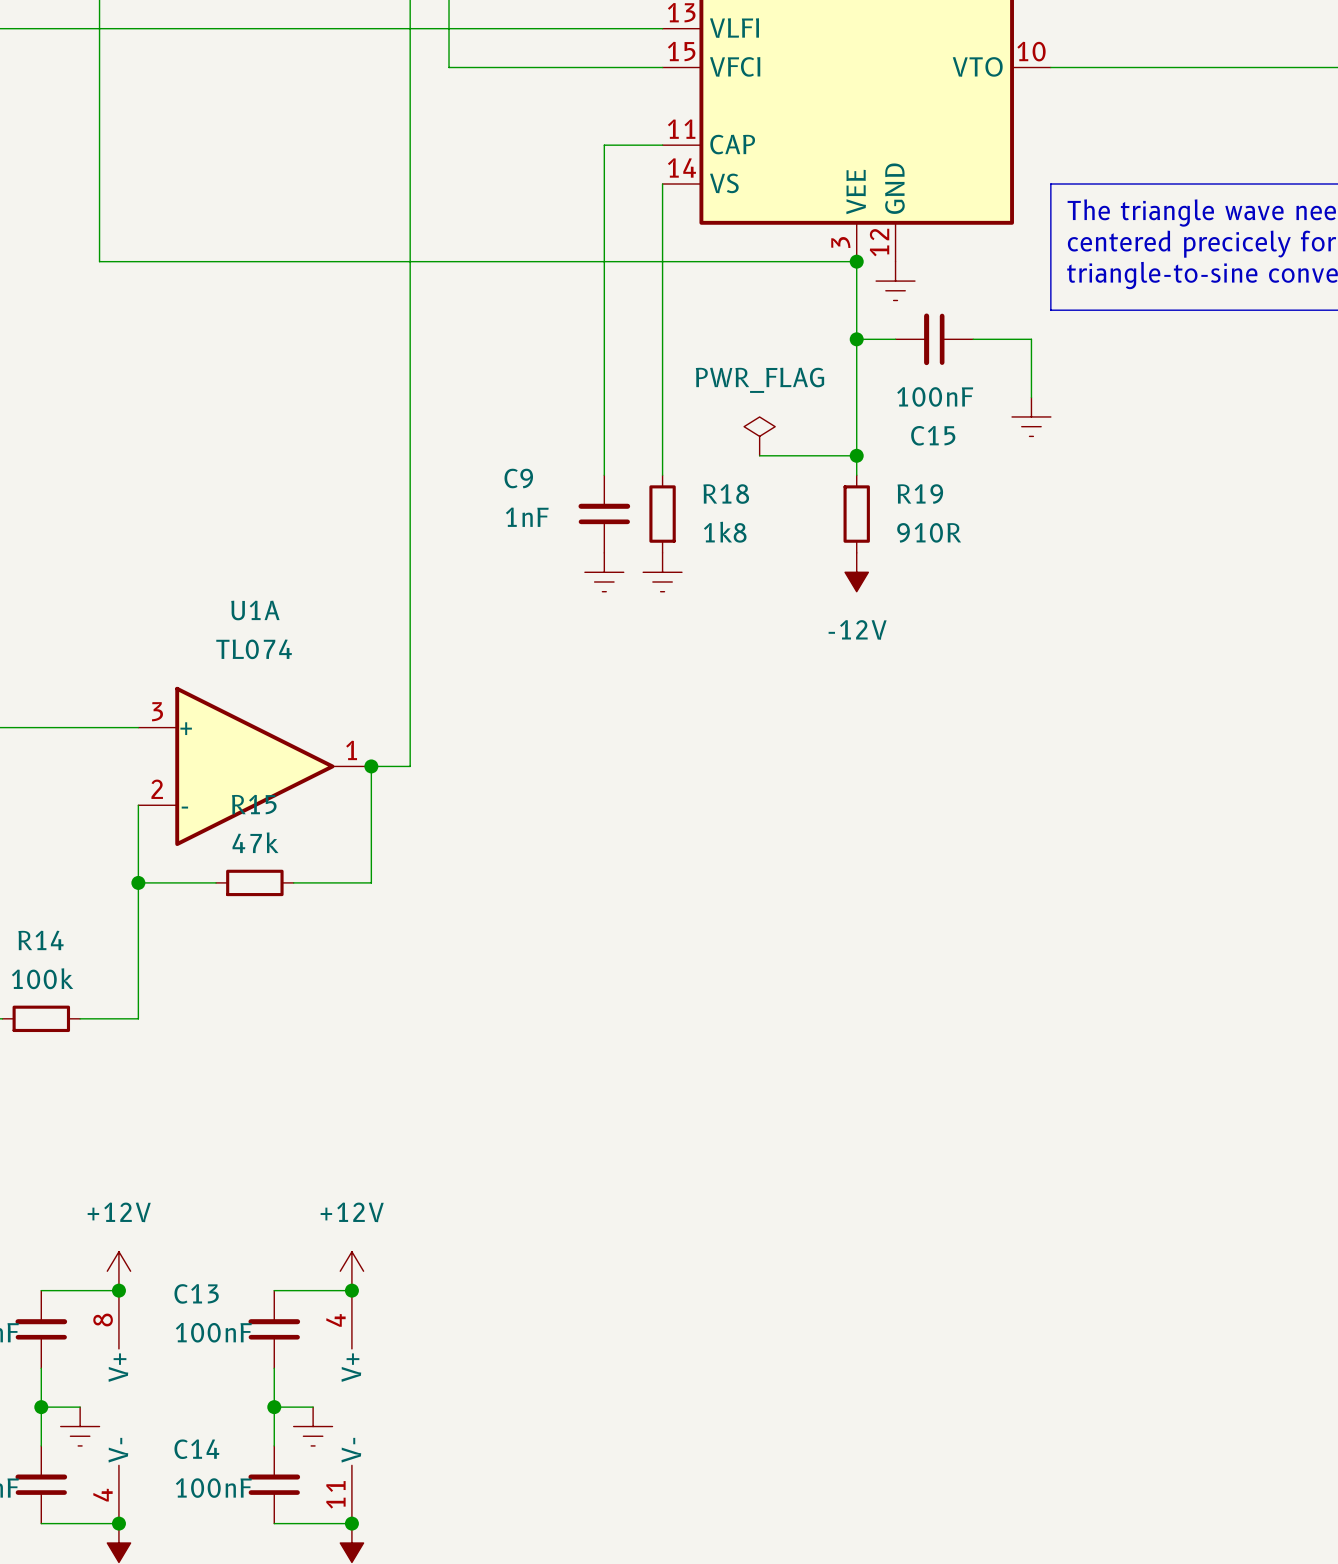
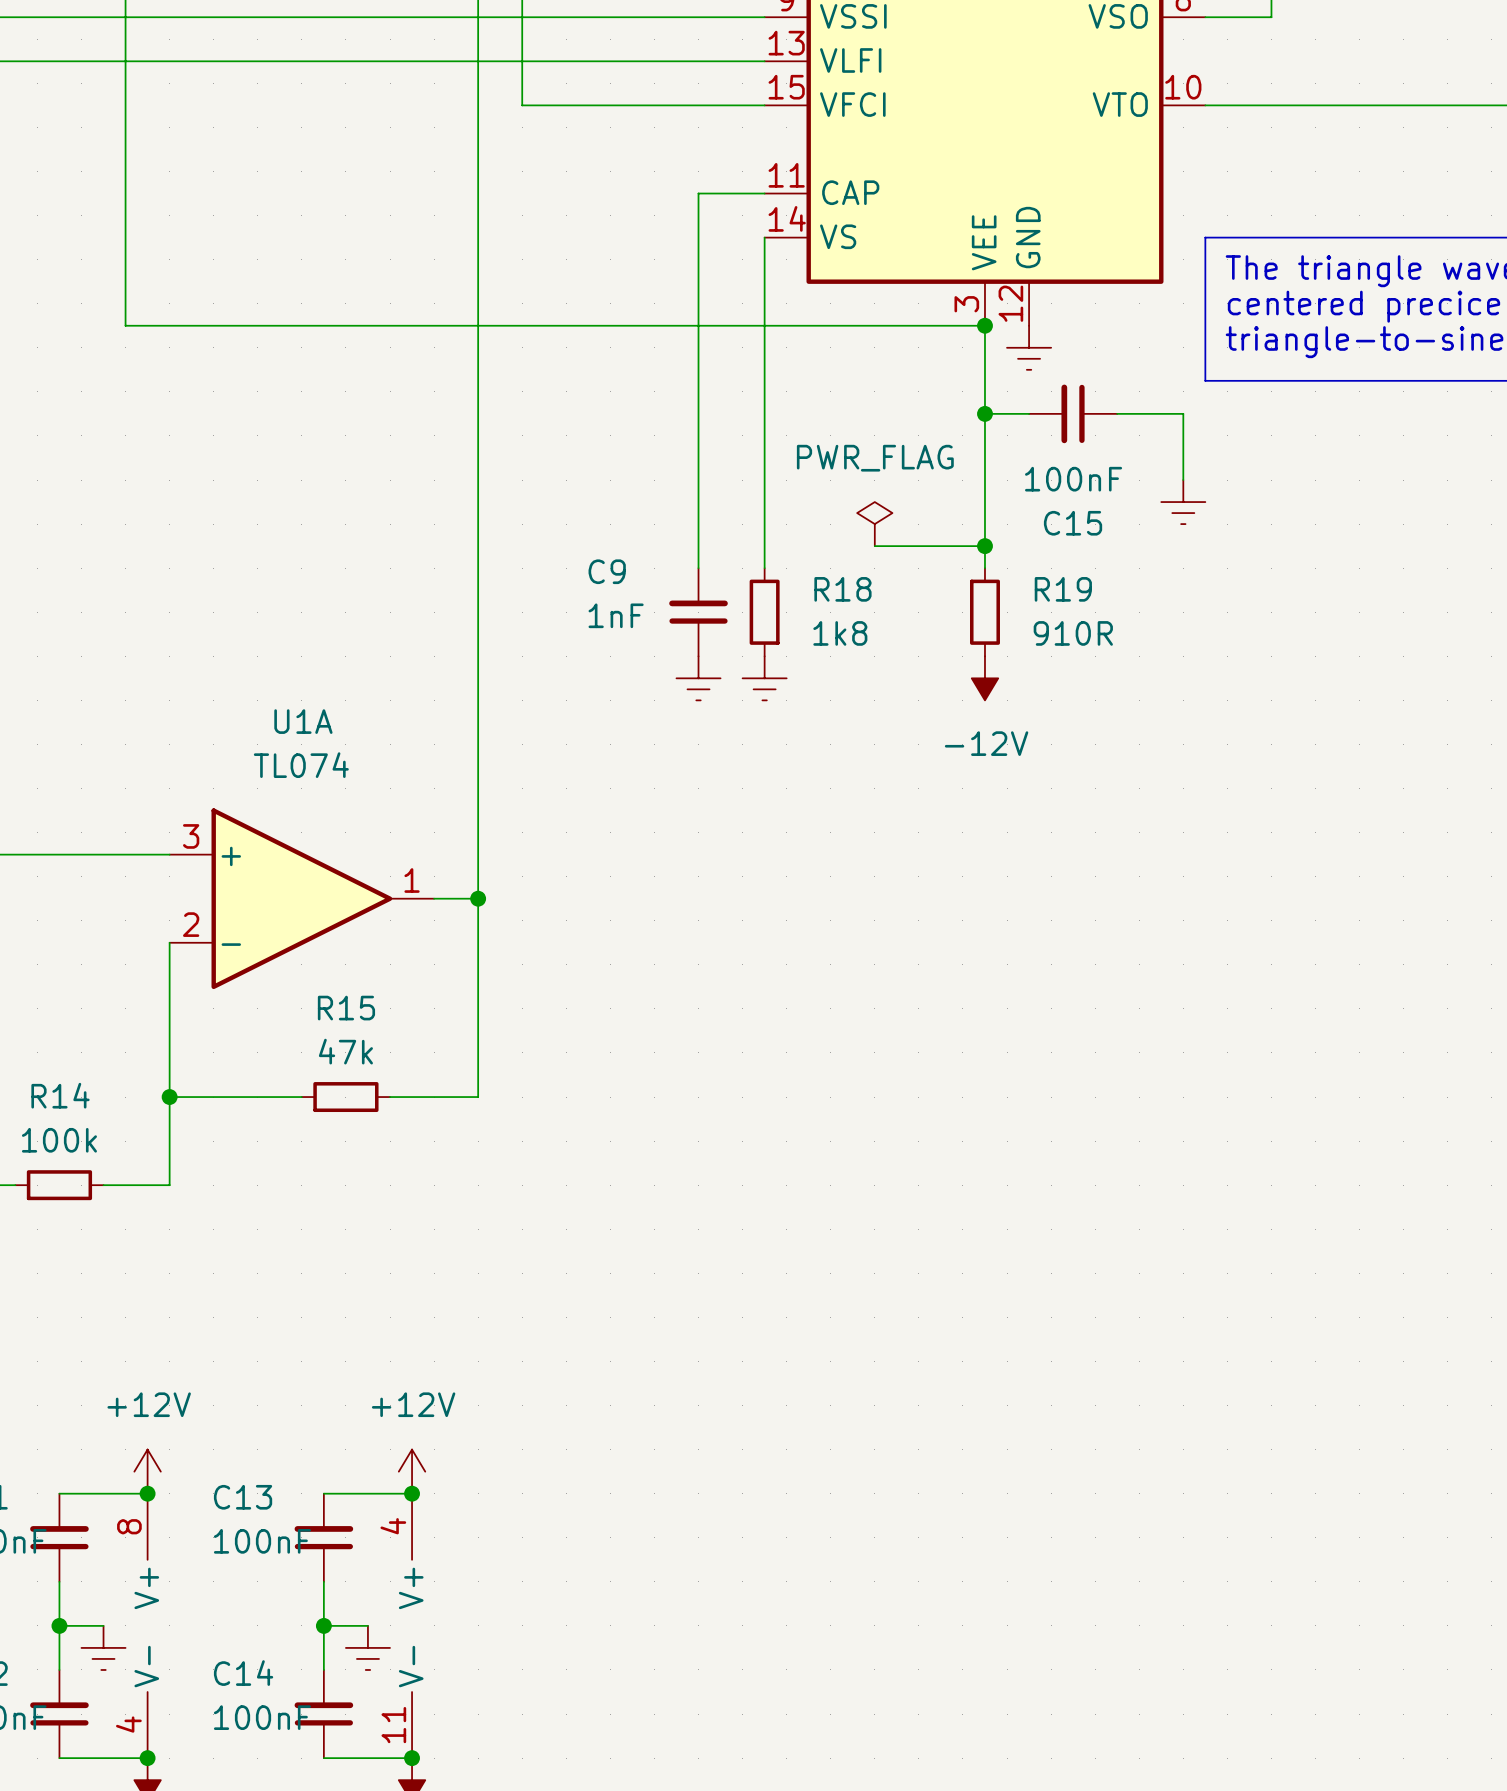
wire: (371, 766) (371, 882) (293, 882) -> none
junction position: (371, 766) -> (478, 898)
wire: none -> (478, 898) (478, 1097) (390, 1097)
wire: (138, 882) (216, 882) -> none
junction position: (138, 882) -> (169, 1097)
R15 position: (254, 882) -> (345, 1097)
wire: none -> (169, 1097) (301, 1097)

